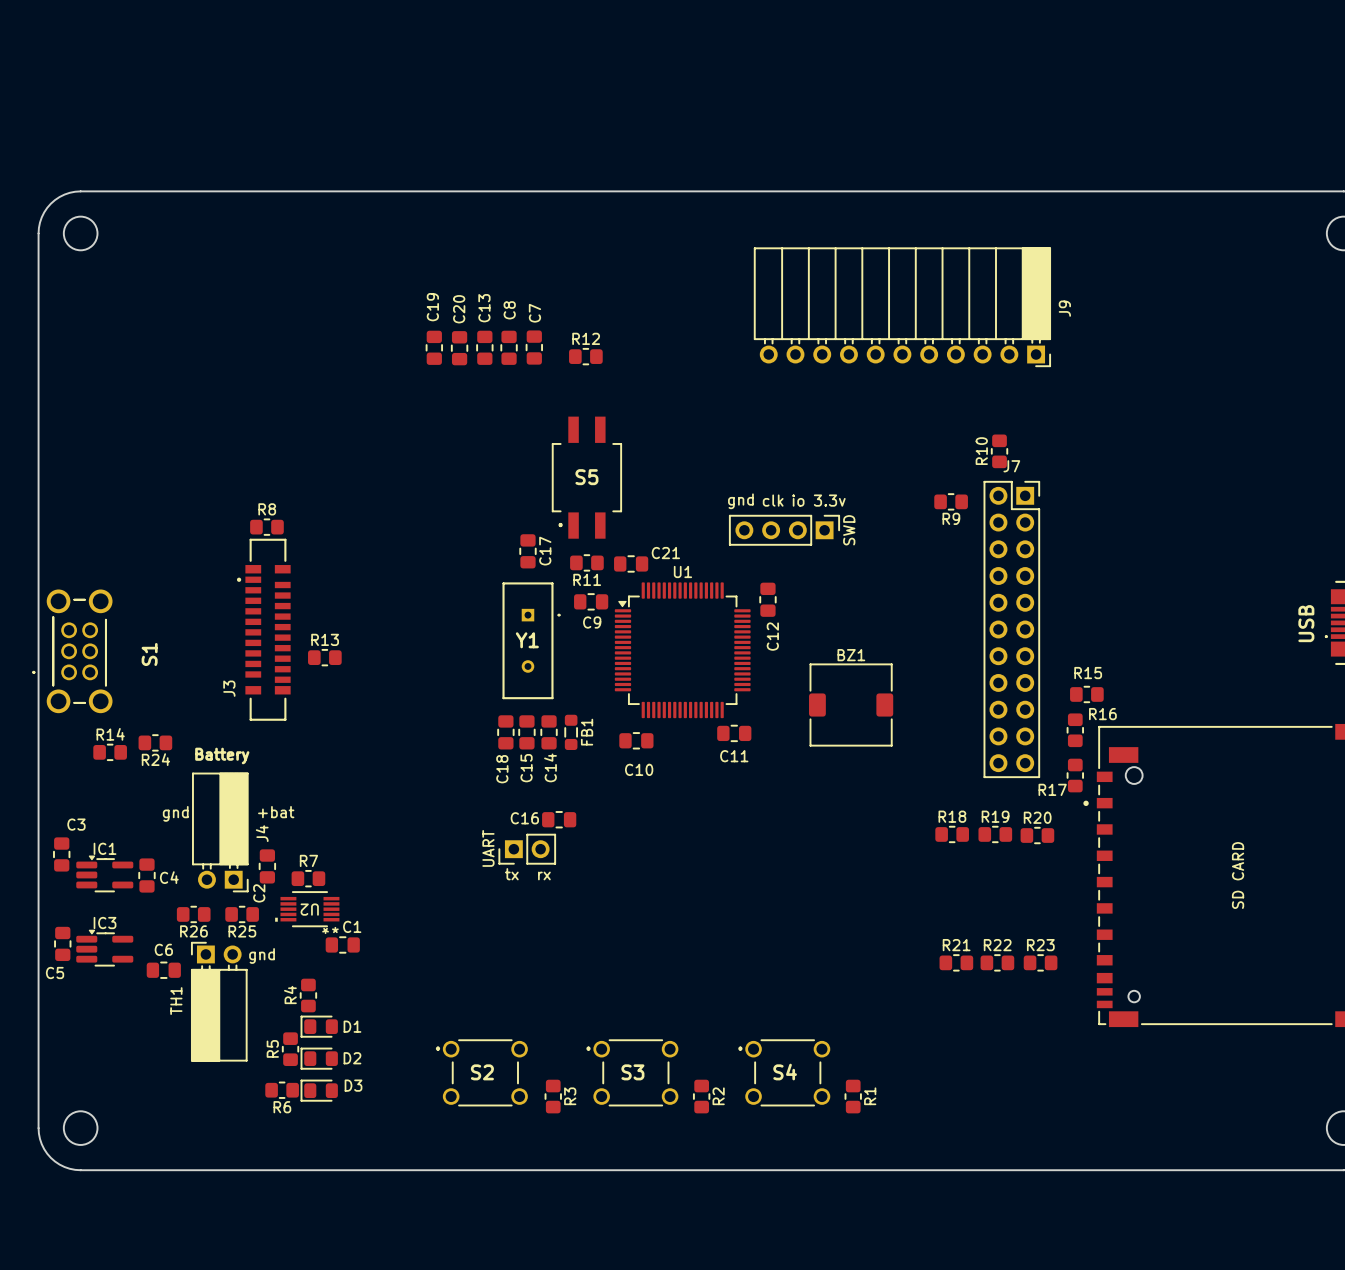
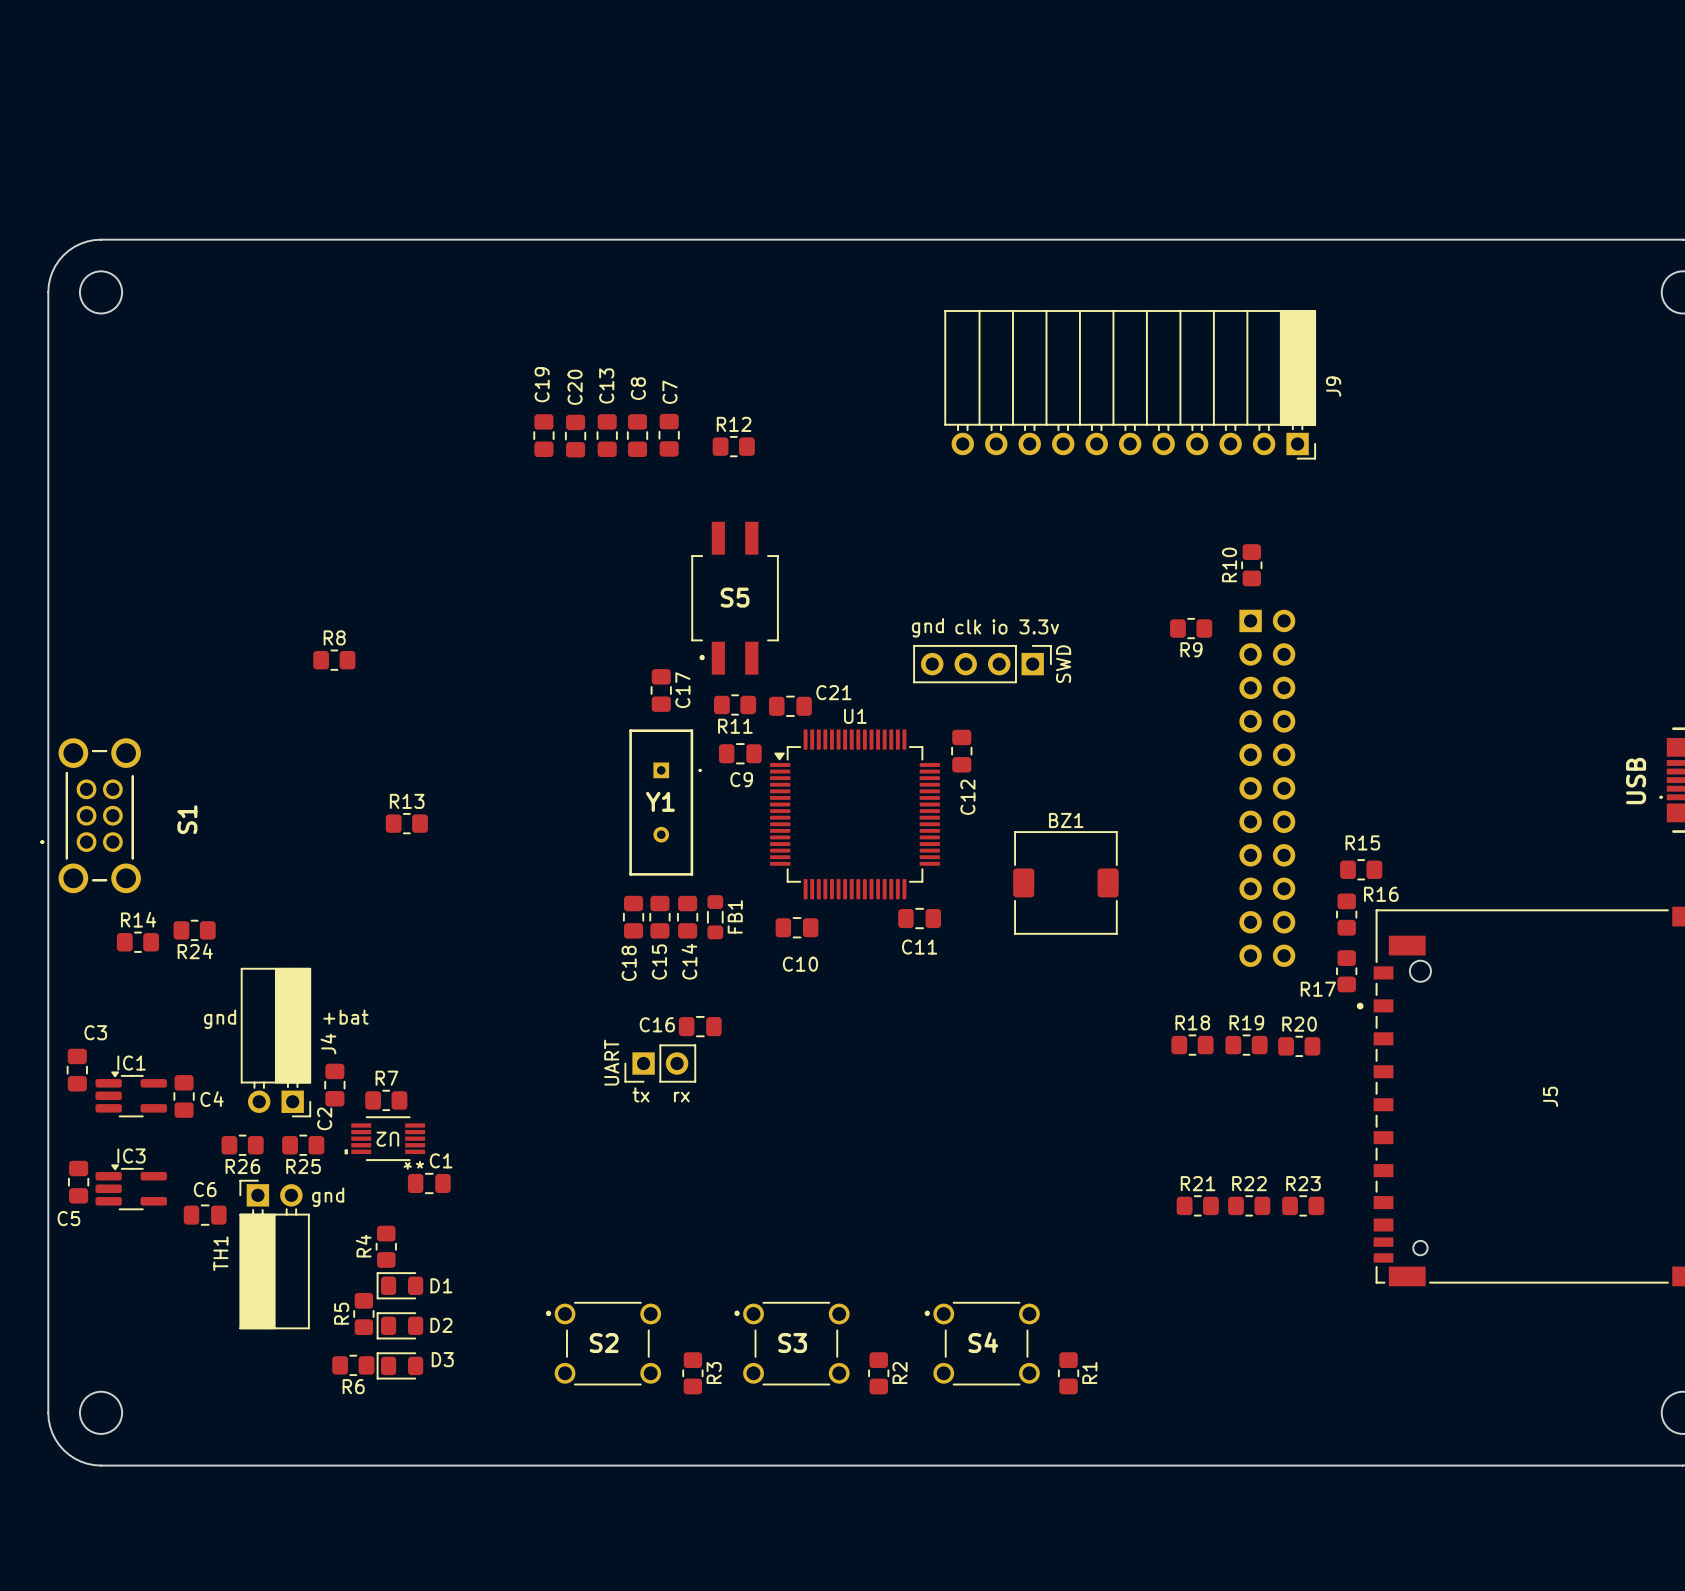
J3: (263, 629) -> none
J7 side: top (1011, 629) -> bottom (1267, 788)
text: Battery (222, 755) -> none
SD CARD name: SD CARD (1238, 875) -> J5 (1550, 1096)

